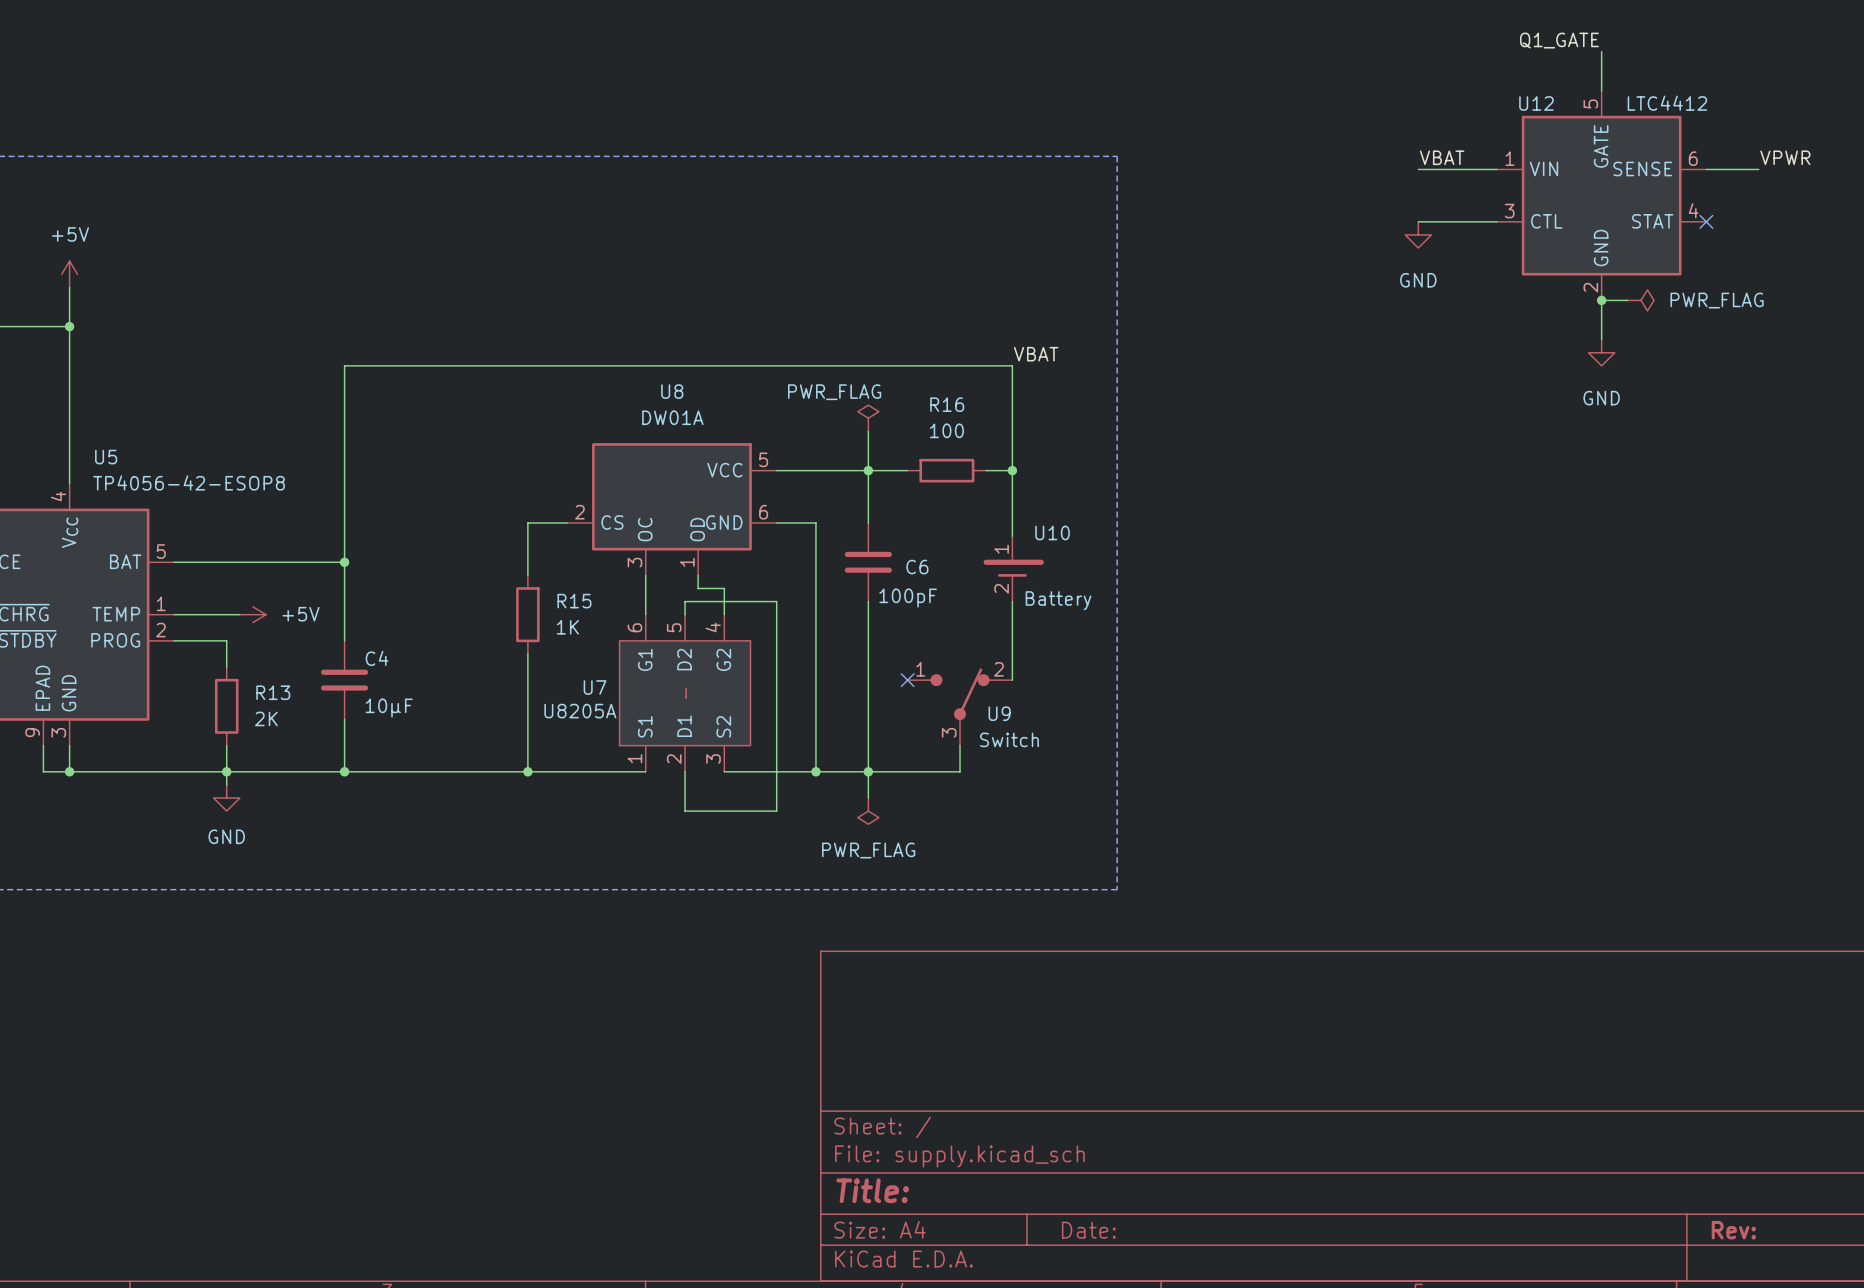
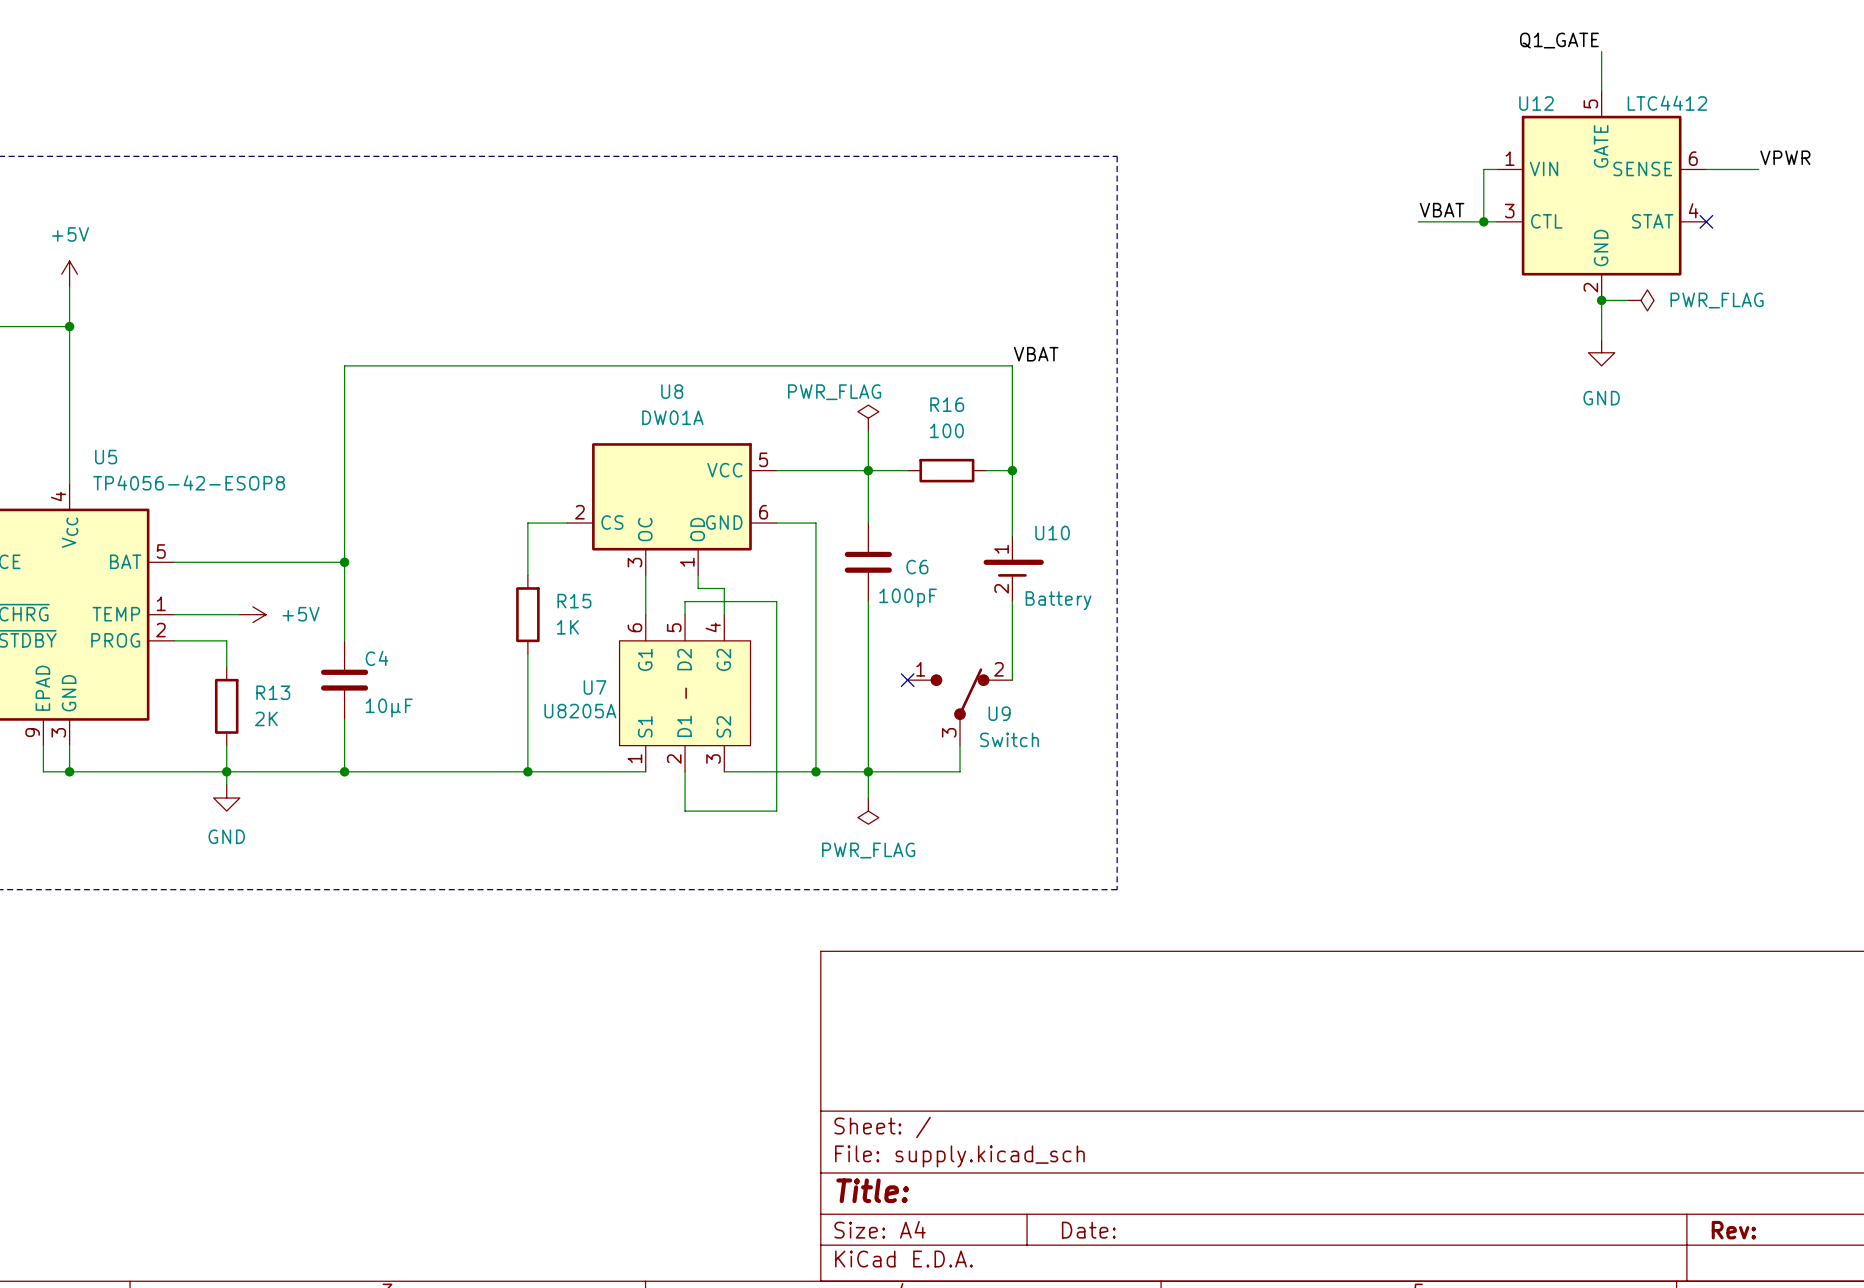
label position: VBAT (1442, 157) -> VBAT (1442, 210)
wire: (1418, 169) (1483, 169) -> (1483, 221) (1483, 169)
junction: none -> (1483, 221)
power symbol: GND (1418, 234) -> none

